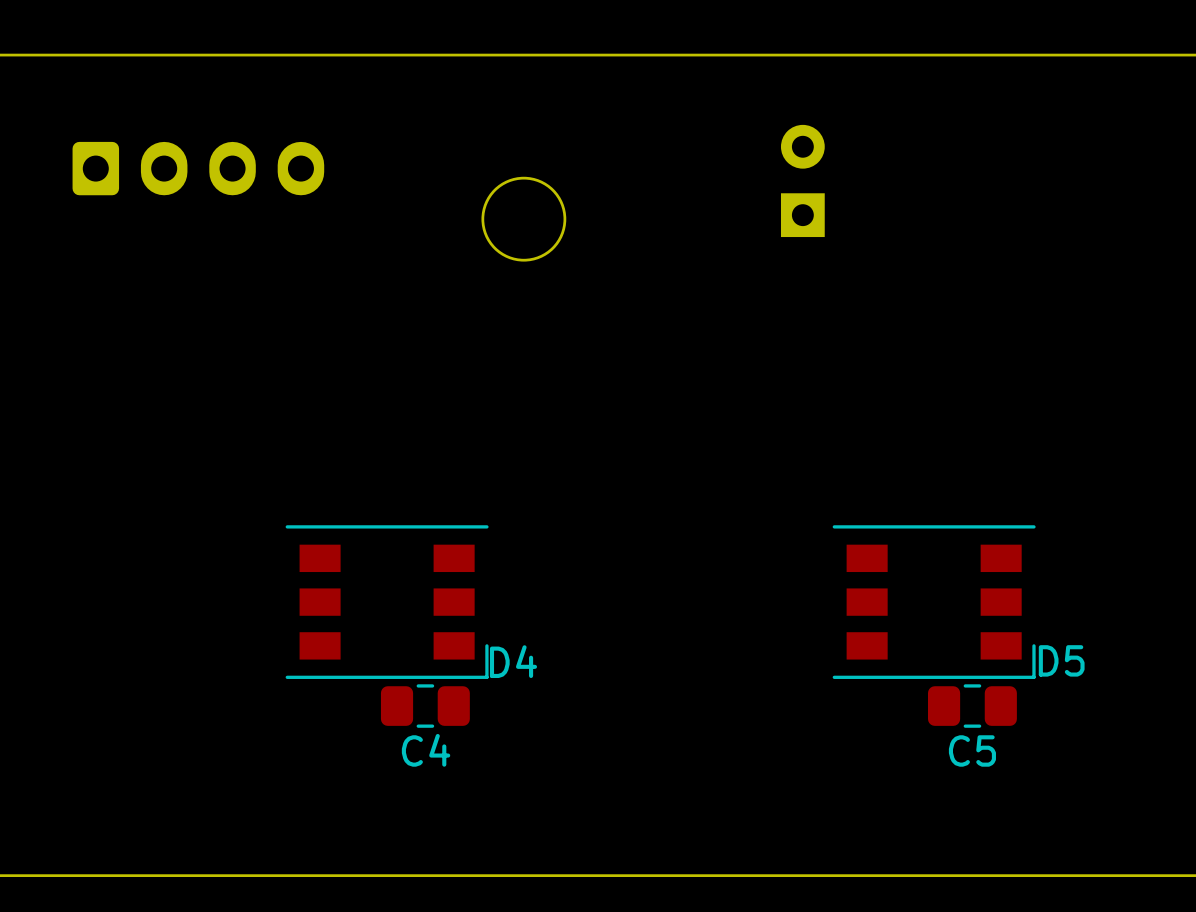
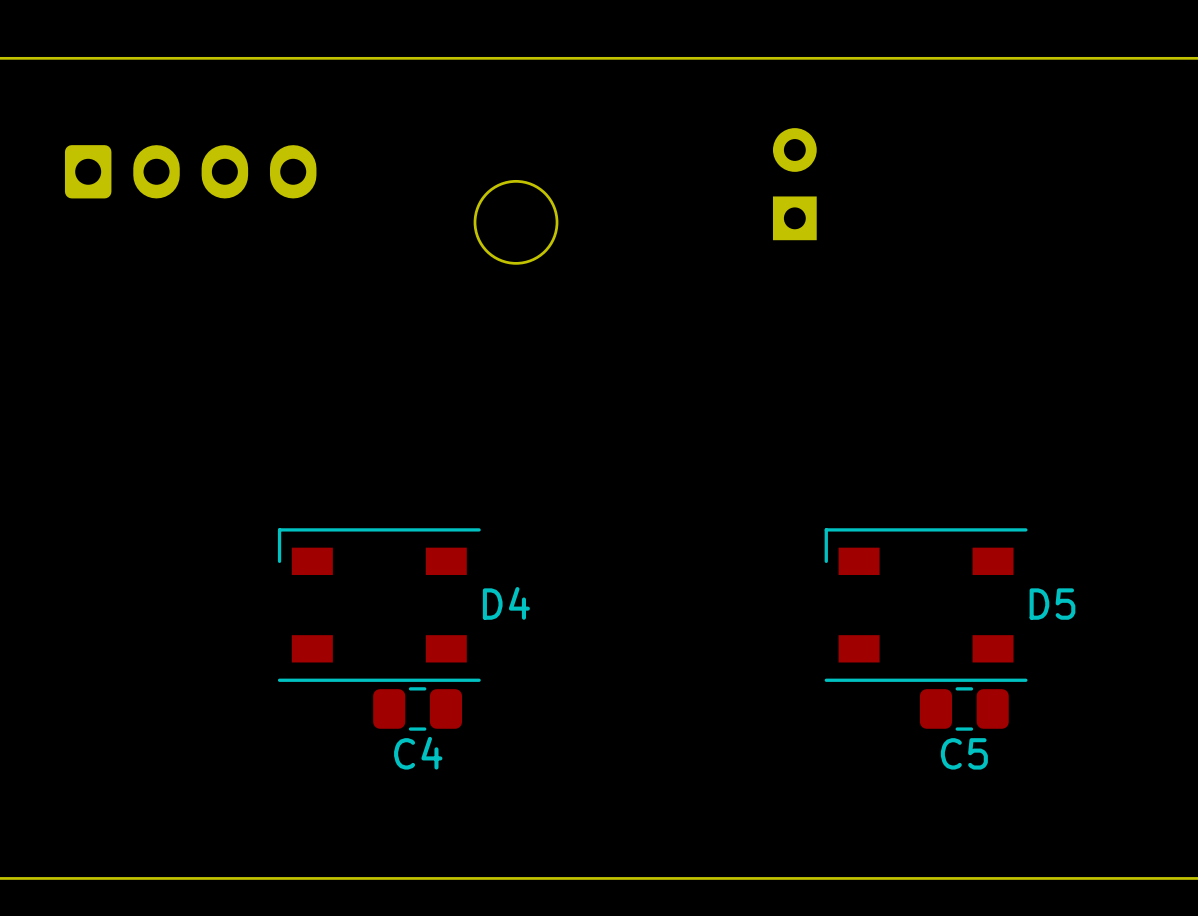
D4 footprint: [285, 525, 489, 679] -> [277, 528, 481, 682]
D5 footprint: [832, 525, 1036, 679] -> [824, 528, 1028, 682]
D5 name position: D5 (1061, 660) -> D5 (1052, 604)
D4 name position: D4 (513, 661) -> D4 (506, 603)

